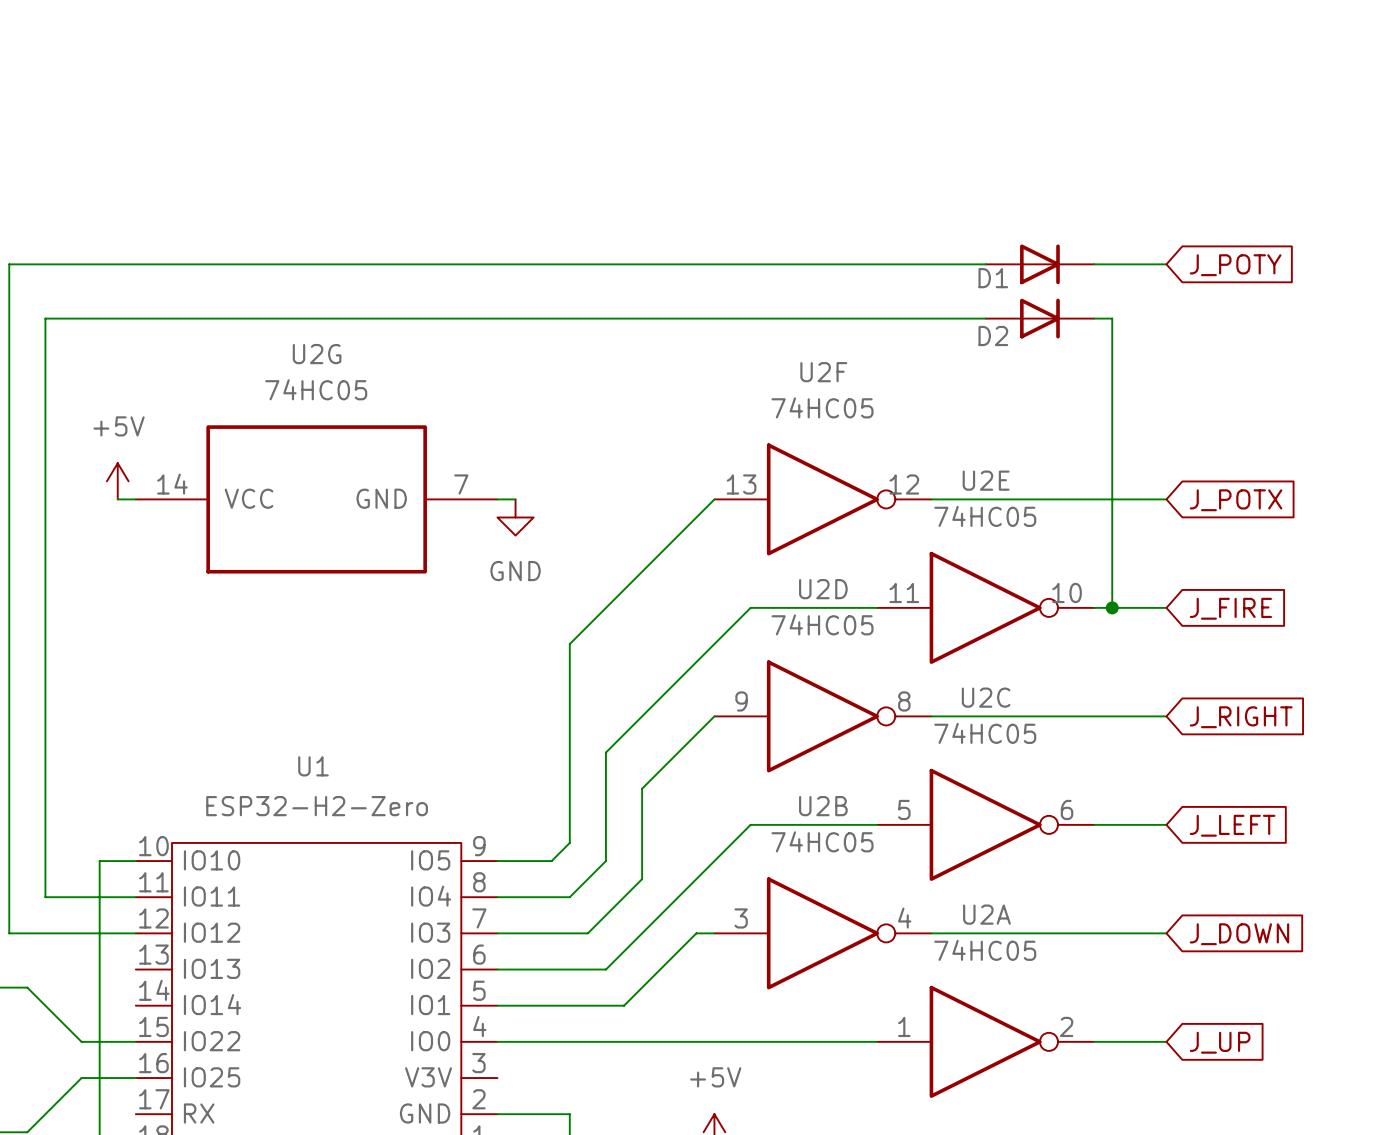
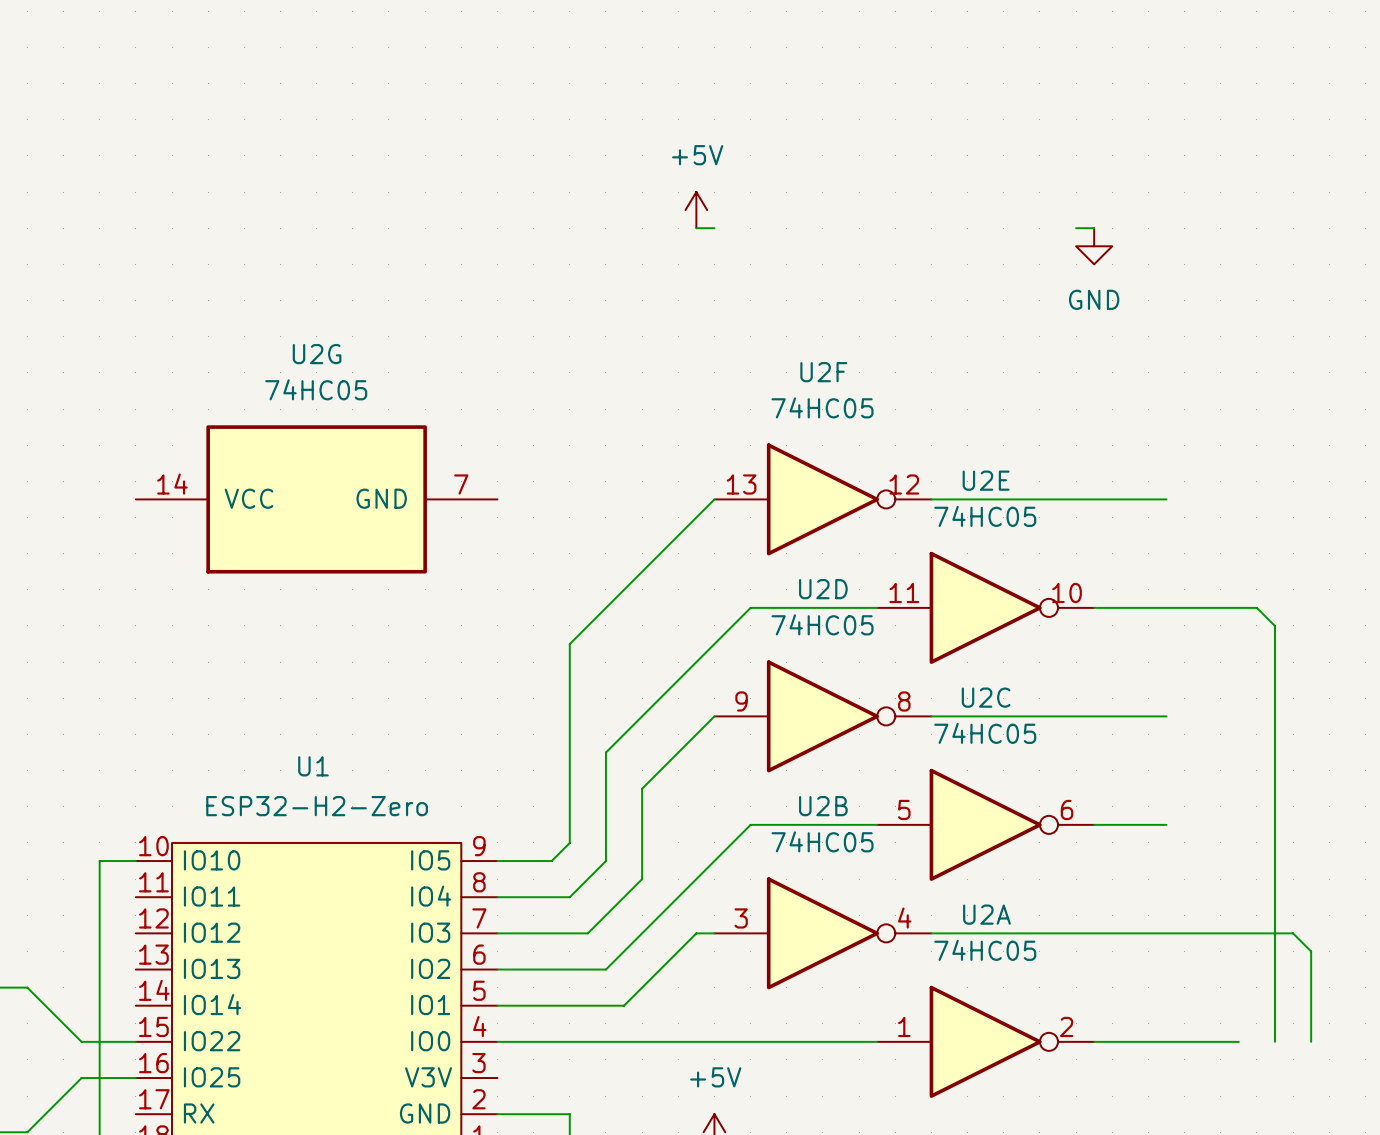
power symbol: none -> +5V (696, 210)
wire: none -> (1076, 228) (1094, 228)
power symbol: none -> GND (1094, 246)
wire: (985, 264) (9, 264) (9, 933) (135, 933) -> none
D1: (1039, 264) -> none
wire: (1094, 264) (1166, 264) -> none
global label: J_POTY (1235, 265) -> none
wire: (985, 318) (45, 318) (45, 897) (135, 897) -> none
D2: (1039, 318) -> none
wire: (1094, 318) (1112, 318) (1112, 607) -> none
power symbol: +5V (117, 481) -> none
wire: (117, 499) (135, 499) -> none
wire: (497, 499) (515, 499) -> (696, 228) (714, 228)
global label: J_POTX (1236, 500) -> none
power symbol: GND (515, 517) -> none
junction: (1112, 607) -> none
wire: none -> (1166, 607) (1256, 607) (1274, 625) (1274, 1041)
global label: J_FIRE (1230, 608) -> none
global label: J_RIGHT (1241, 717) -> none
global label: J_LEFT (1232, 825) -> none
wire: none -> (1166, 933) (1293, 933) (1311, 951) (1311, 1041)
global label: J_DOWN (1239, 934) -> none
wire: none -> (1166, 1041) (1238, 1041)
global label: J_UP (1220, 1042) -> none

